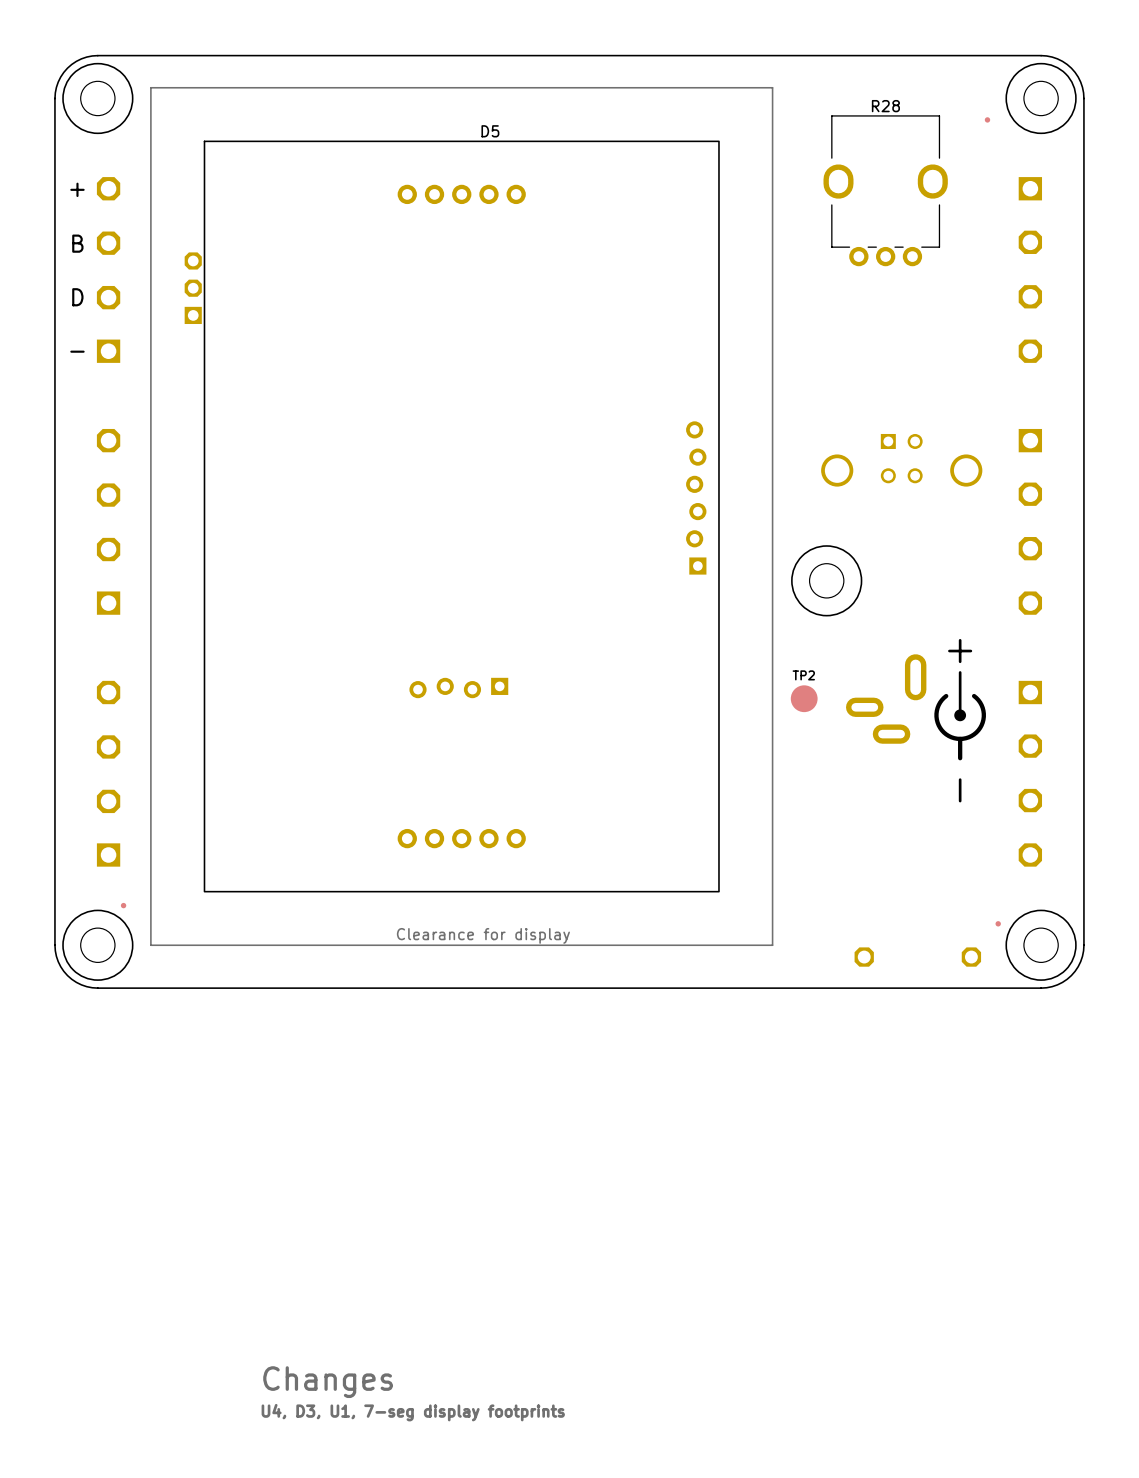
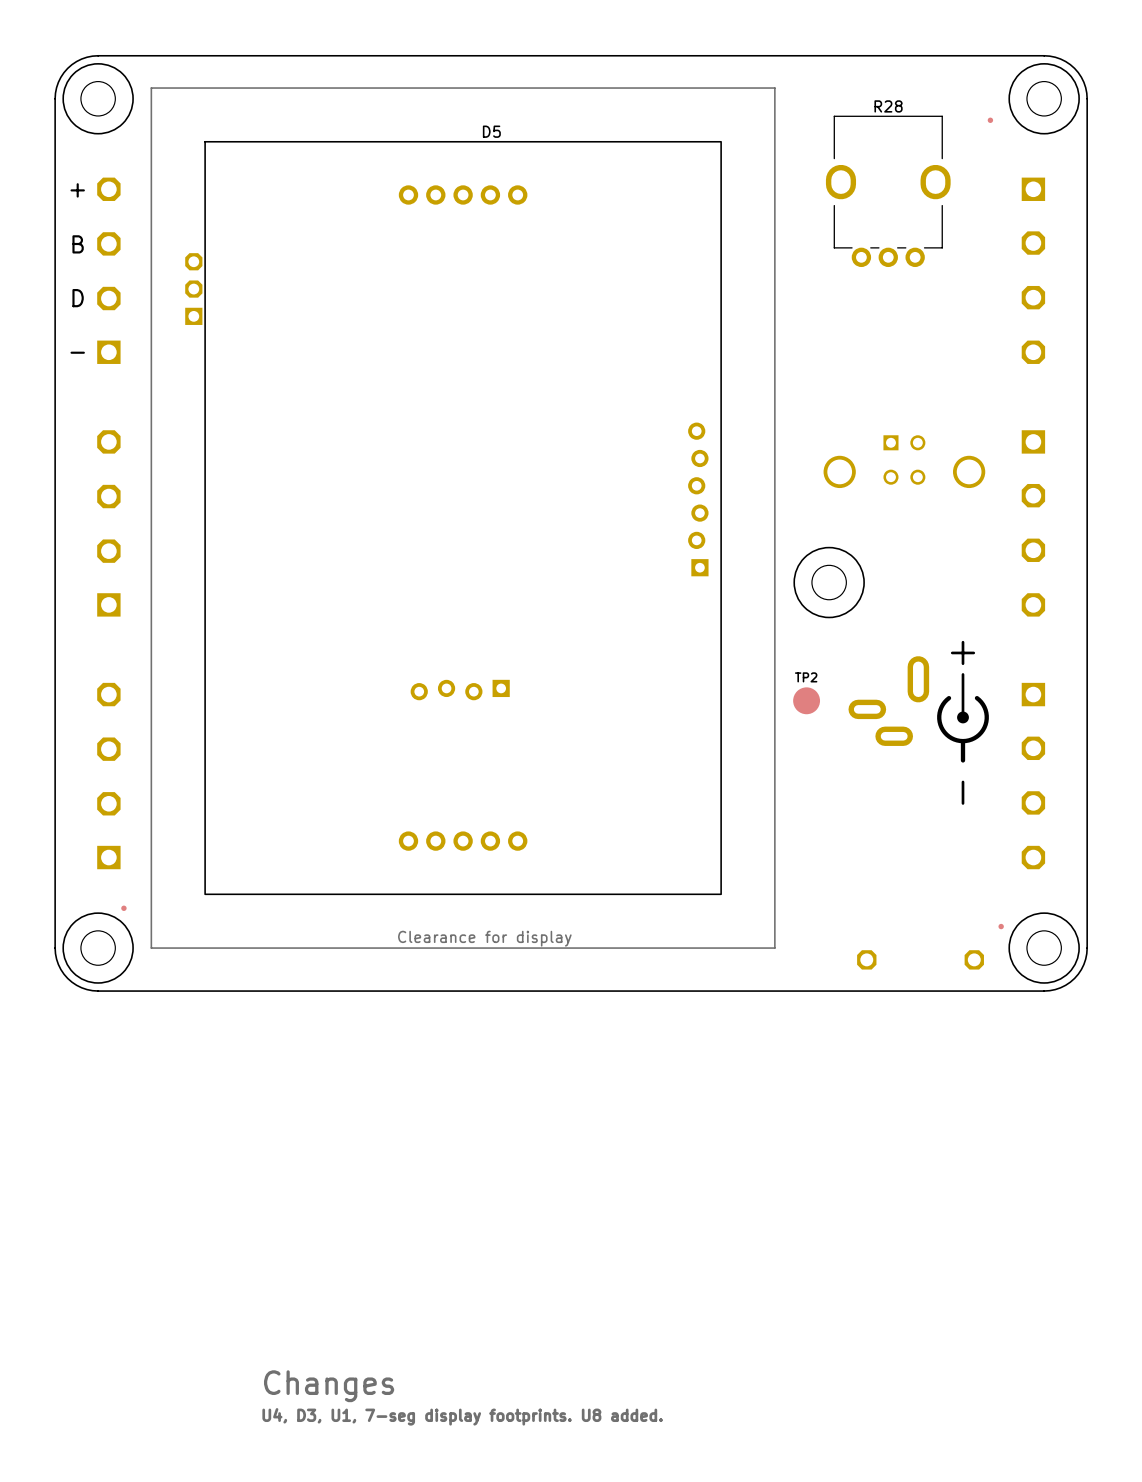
text: U4, D3, U1, 7-seg display footprints (413, 1412) -> U4, D3, U1, 7-seg display footprints. U8 added. (462, 1416)

